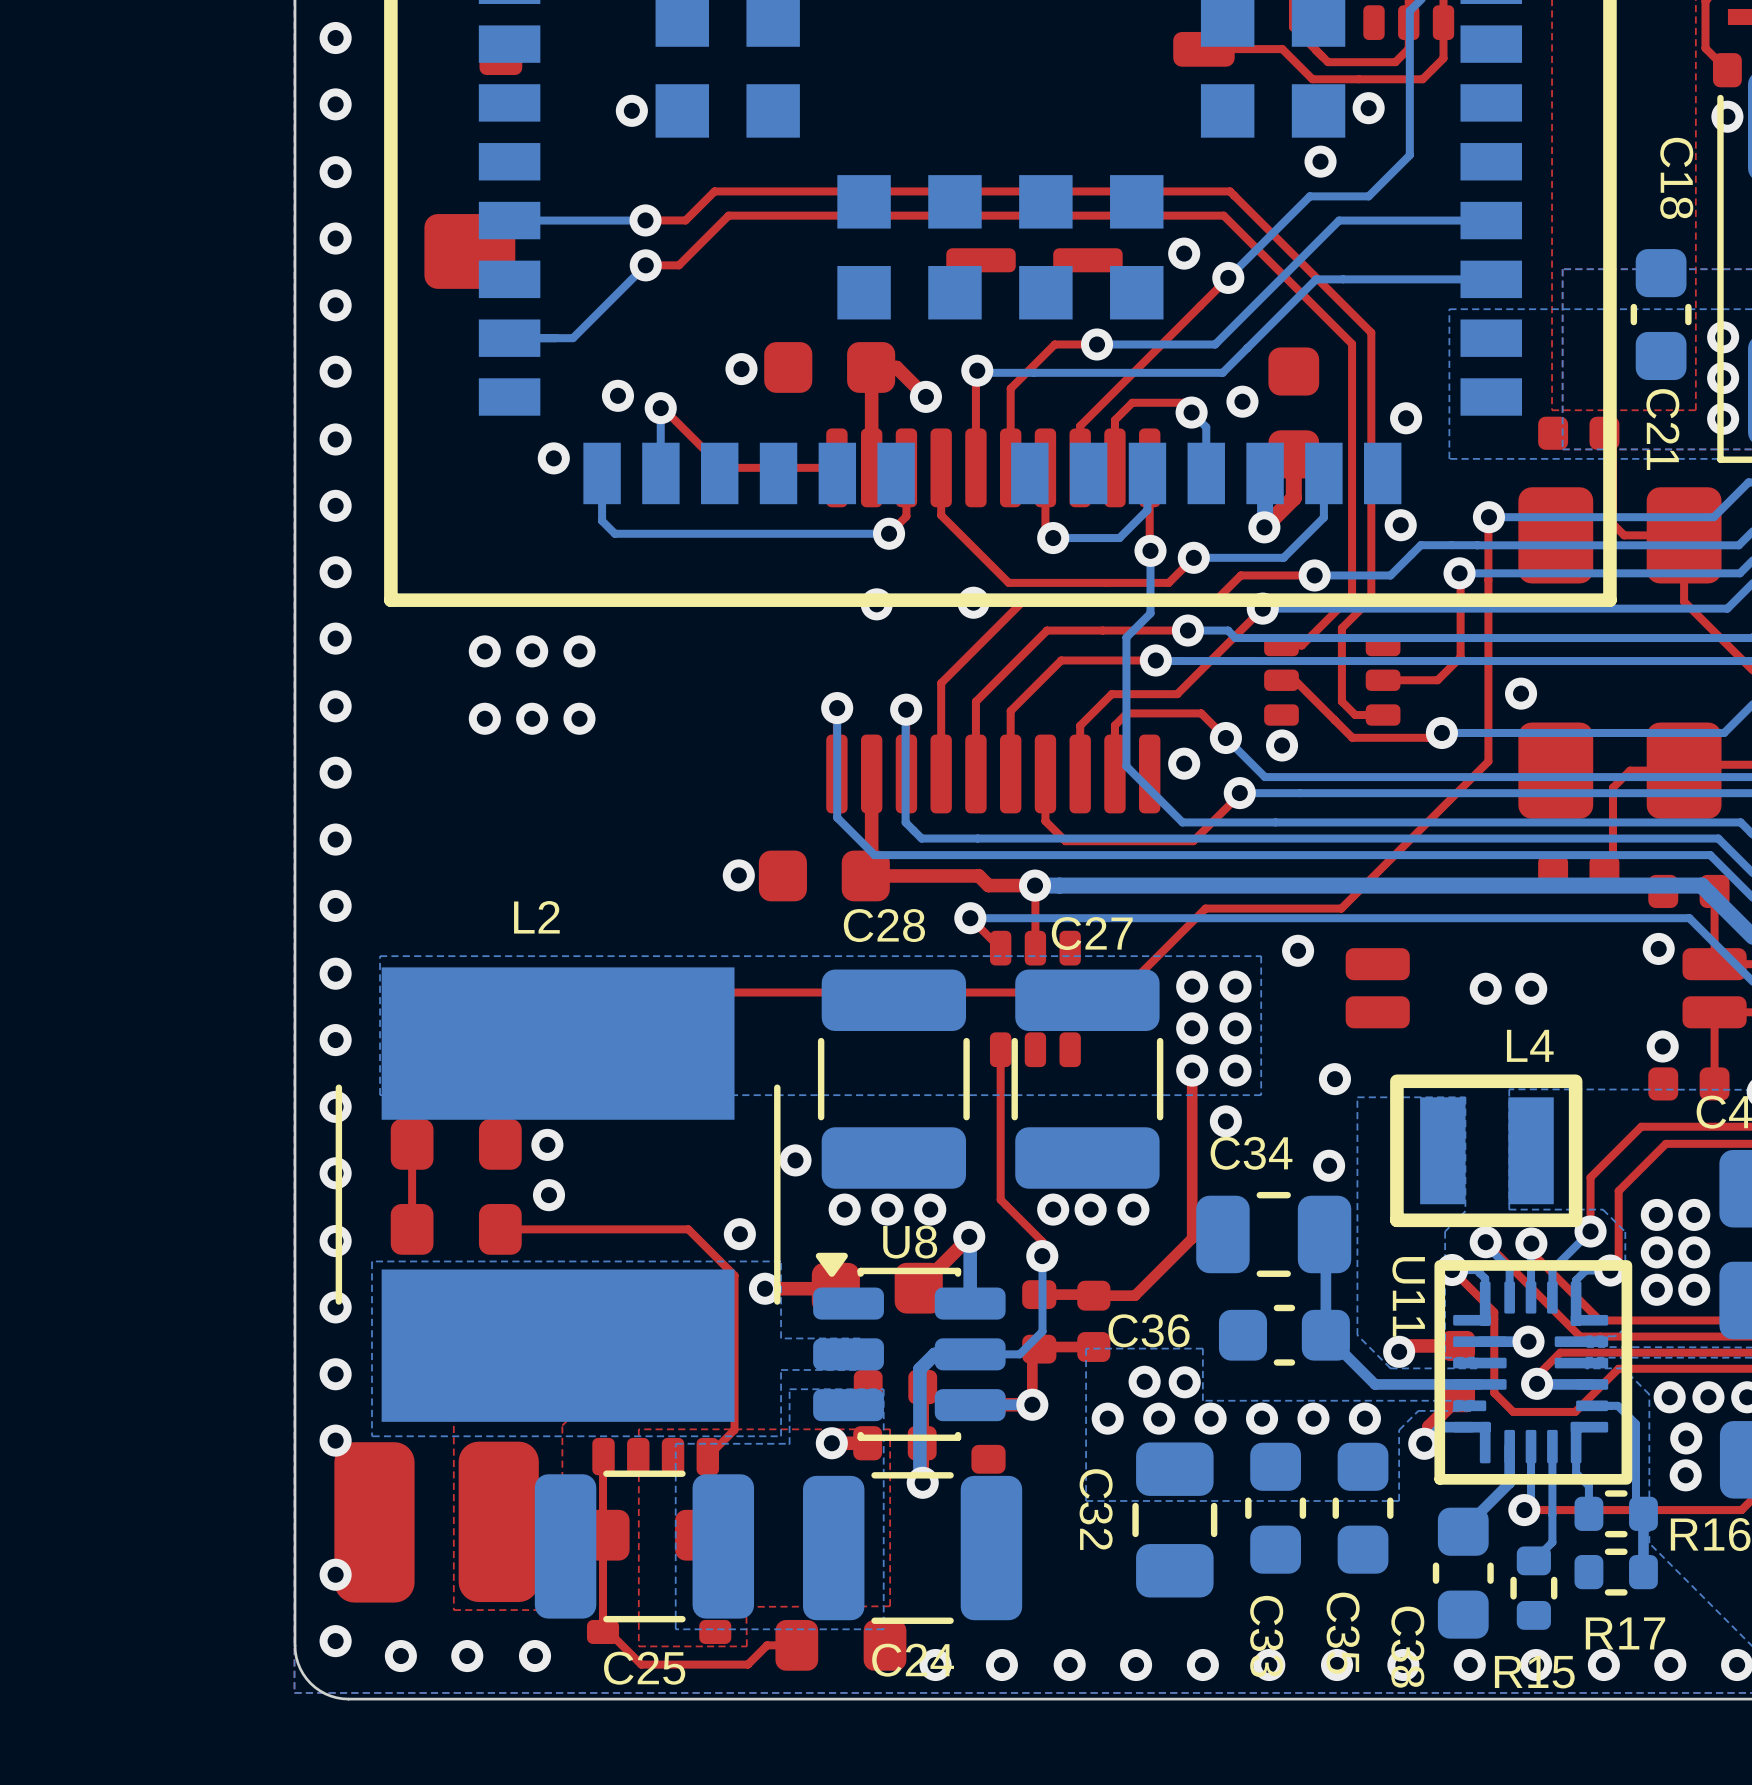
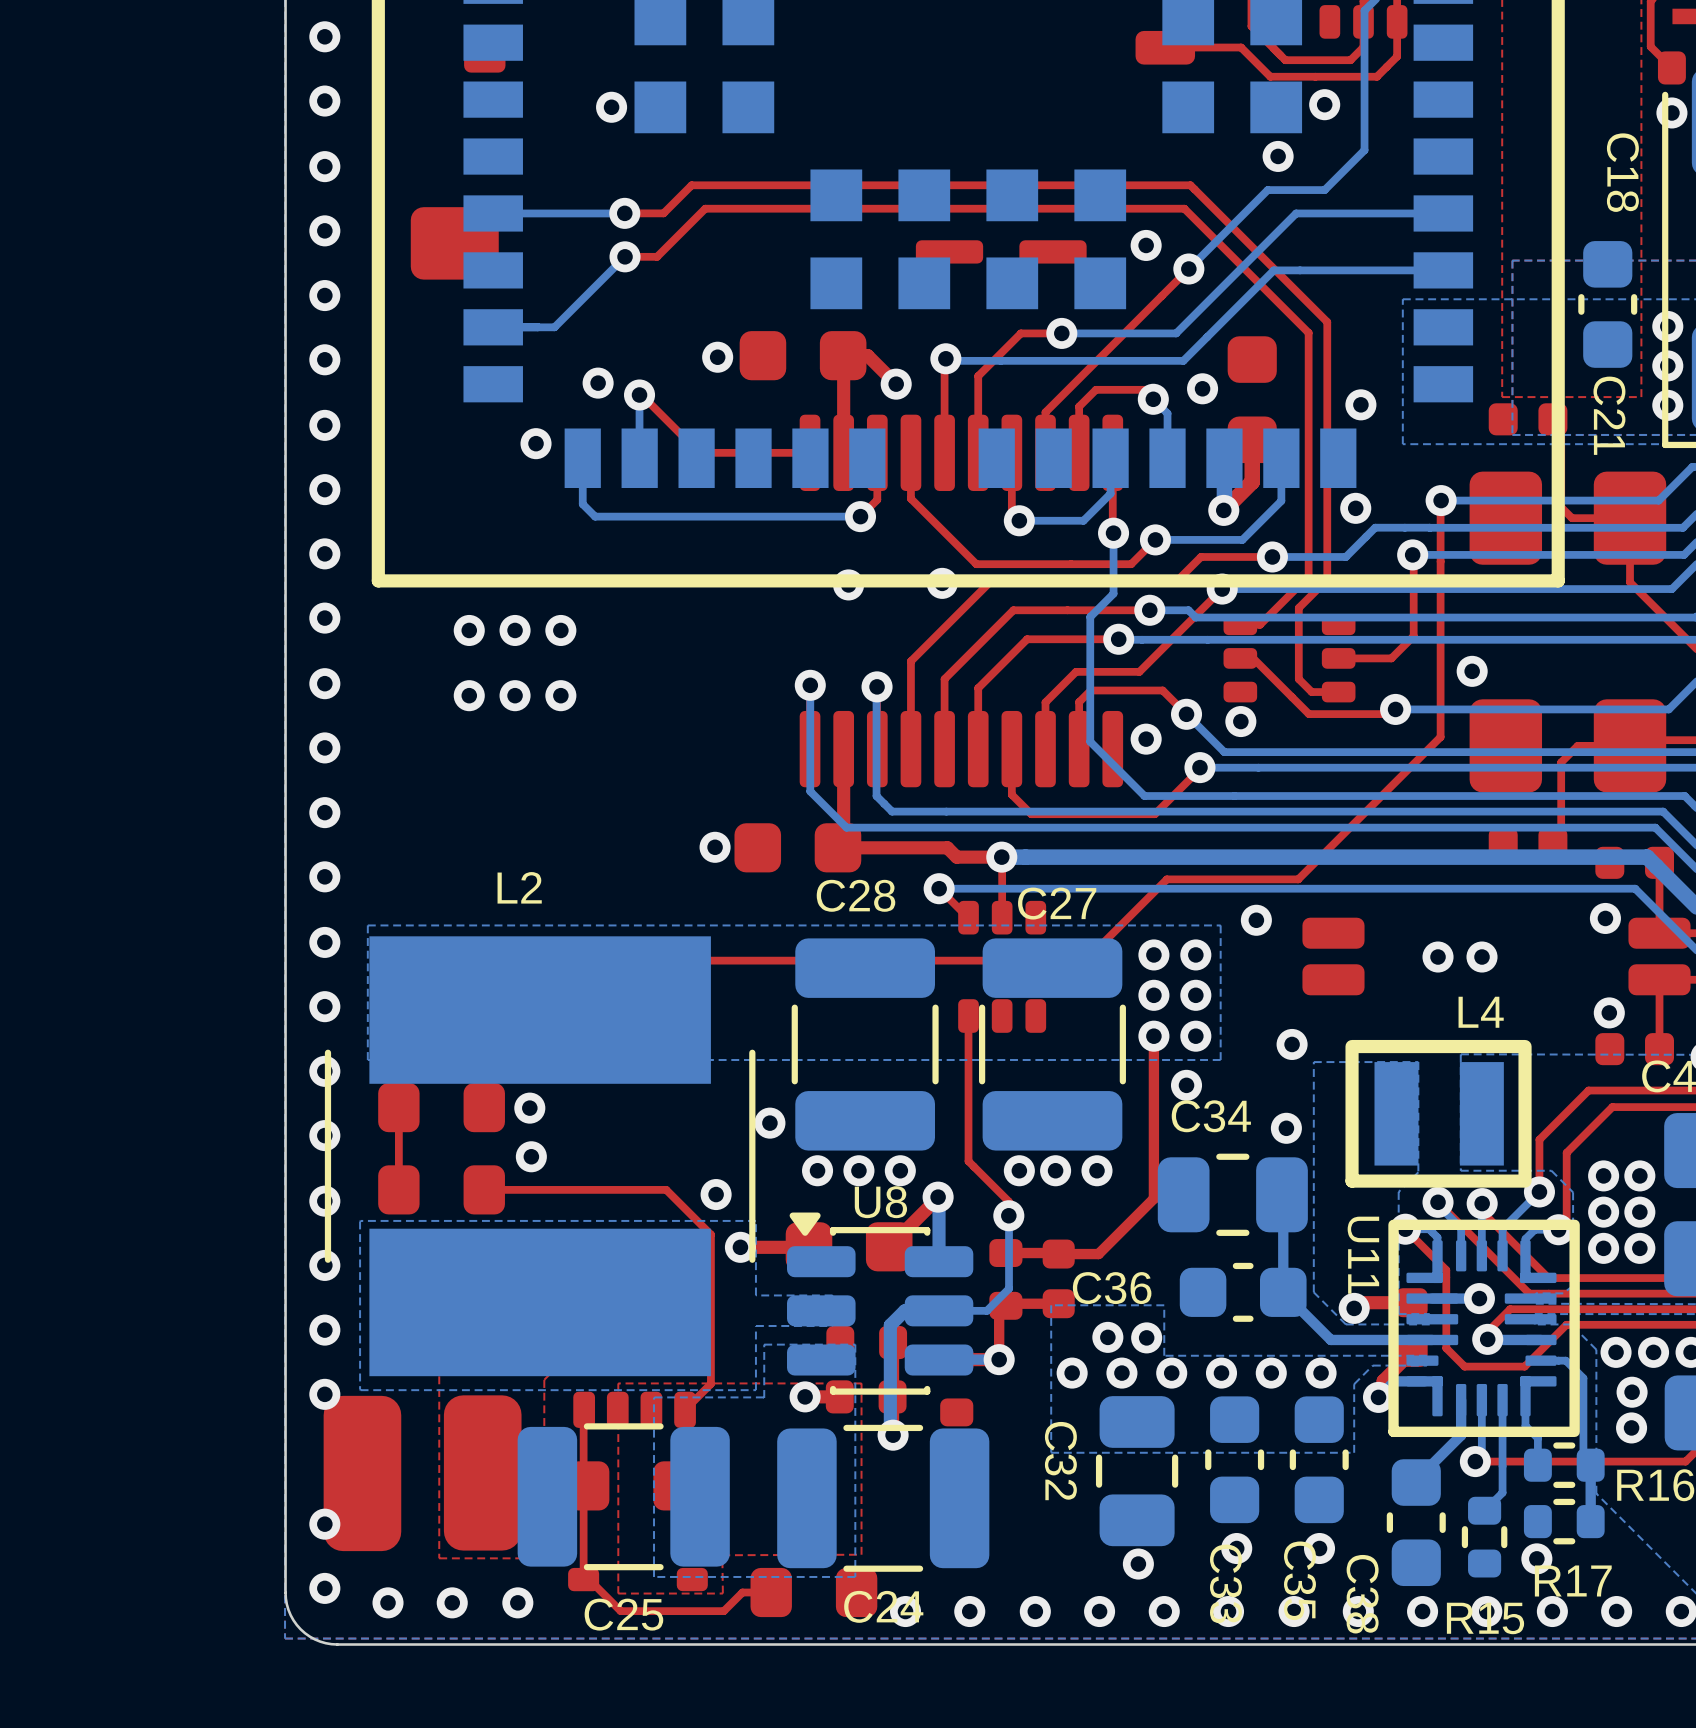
via: none -> (1236, 1548)
via: none -> (1319, 1548)
via: none -> (1536, 1558)
via: none -> (1138, 1564)

